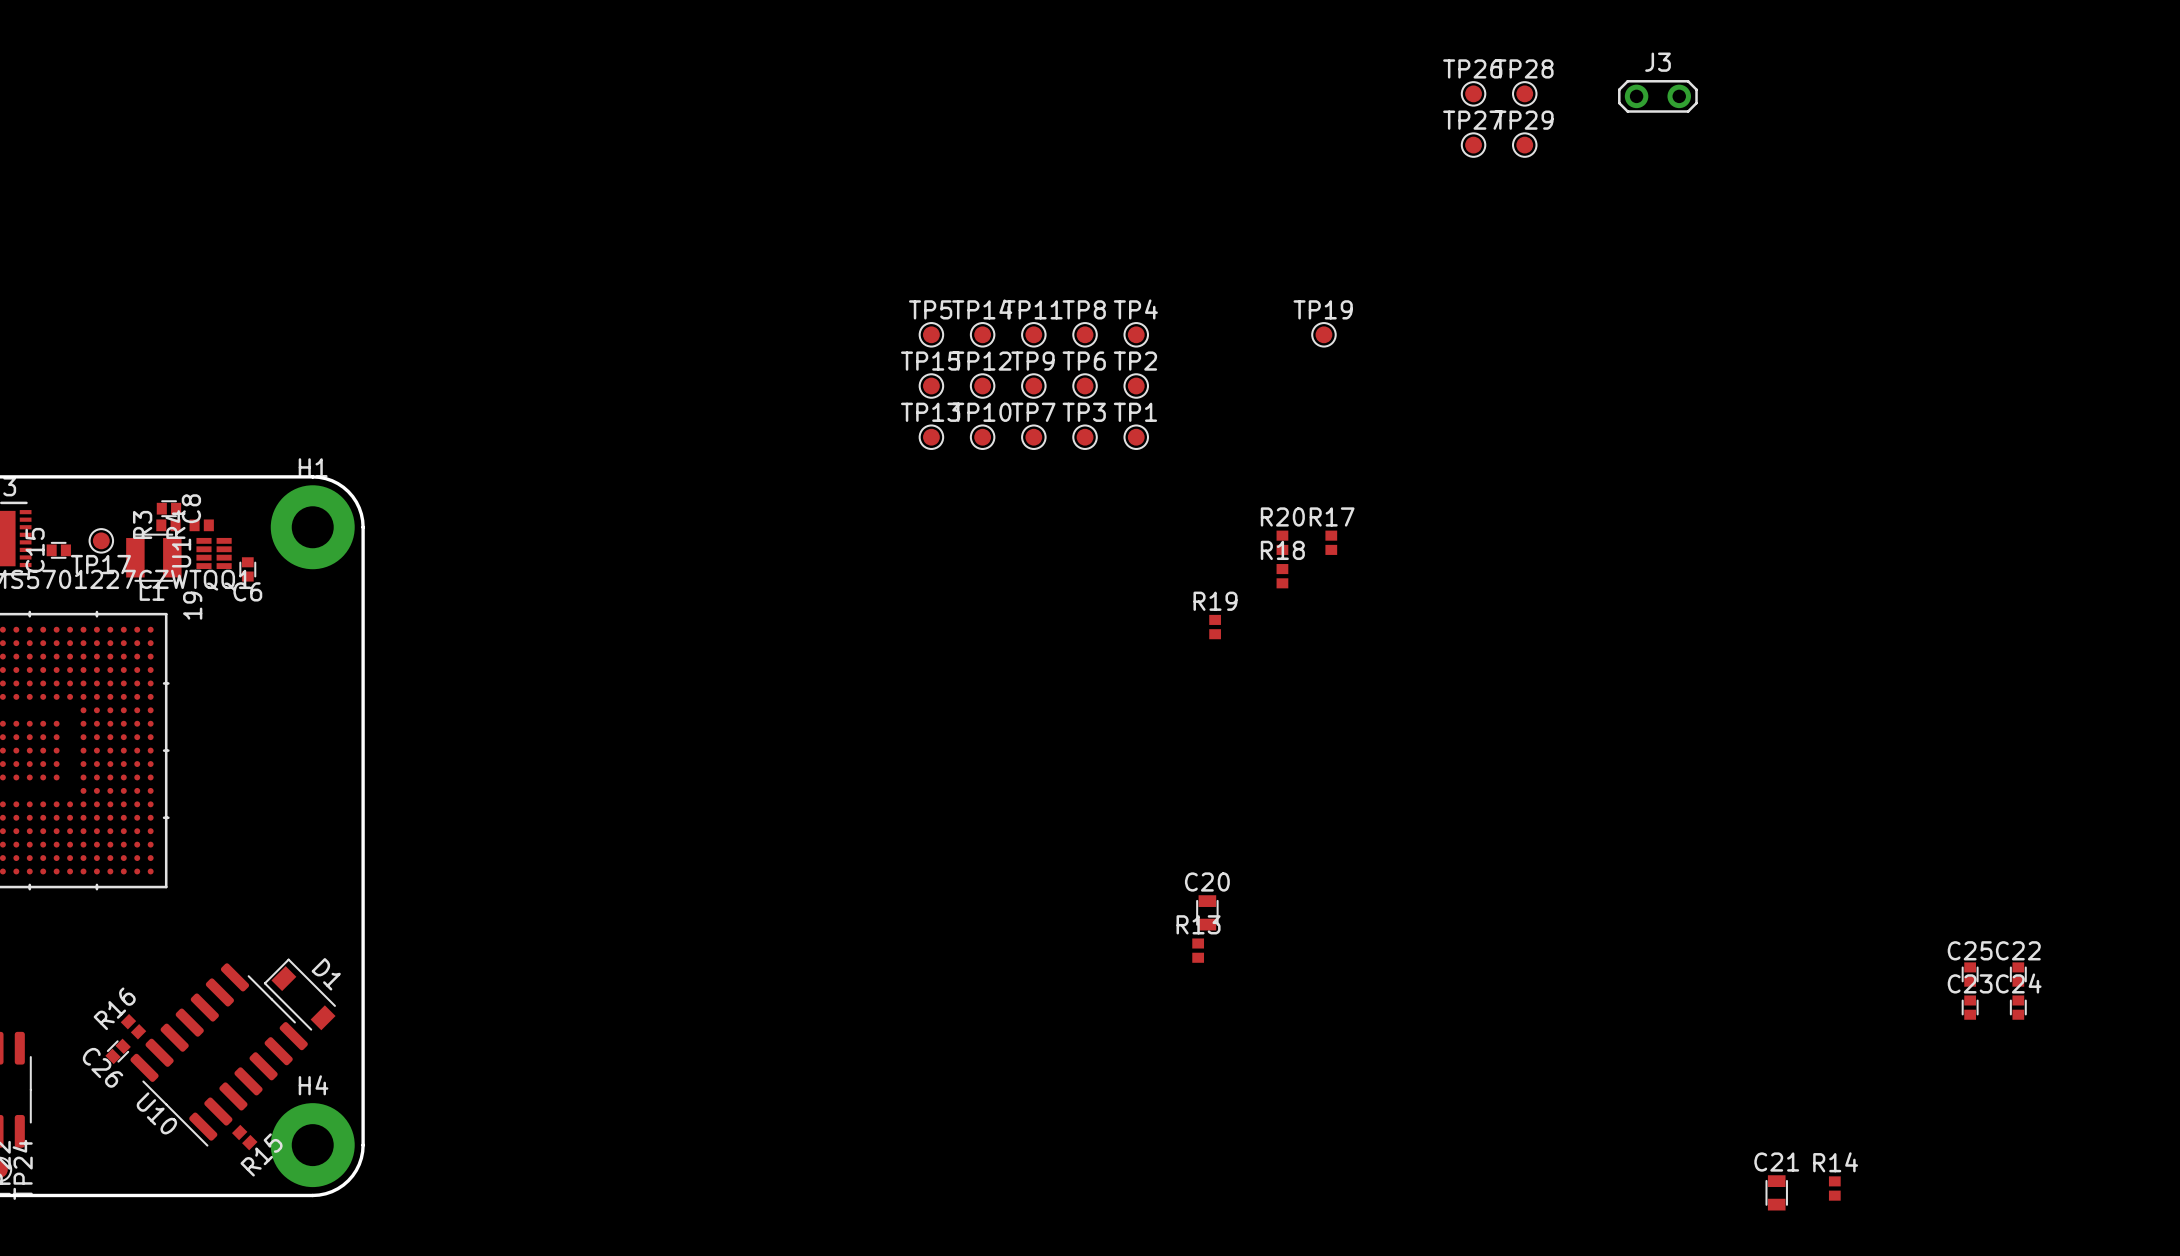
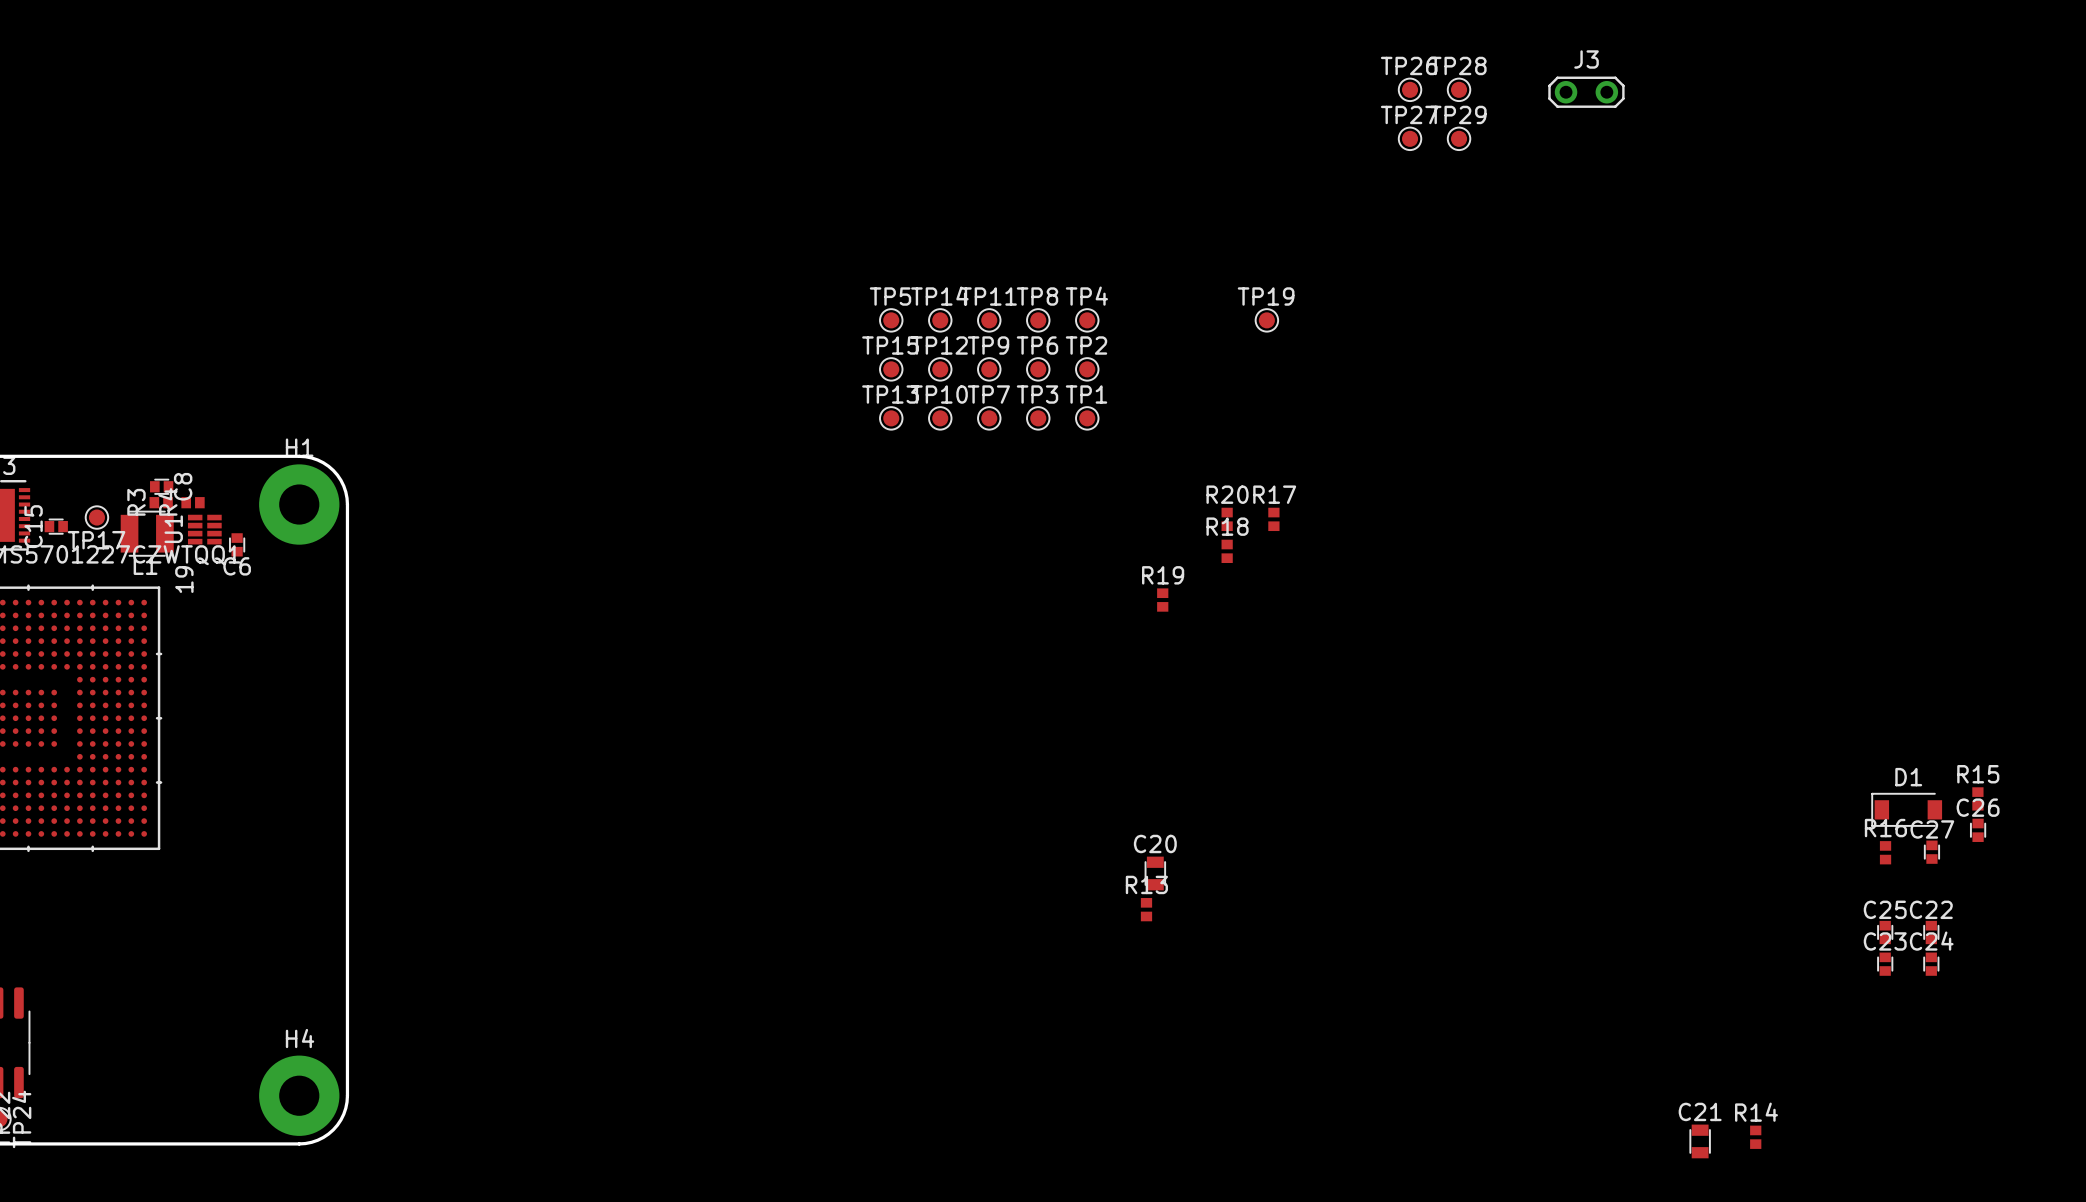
C27: none -> (1931, 852)
D1 rotation: 0° (299, 994) -> 45° counterclockwise (1906, 809)
D1 position: (299, 994) -> (1906, 809)
R16 rotation: 0° (133, 1026) -> 45° clockwise (1885, 852)
R16 position: (133, 1026) -> (1885, 852)
C26 rotation: 0° (118, 1051) -> 45° counterclockwise (1978, 830)
C26 position: (118, 1051) -> (1978, 830)
U10: (219, 1054) -> none
C26 name position: C26 (103, 1067) -> C26 (1978, 807)
R15 rotation: 0° (244, 1137) -> 45° clockwise (1977, 798)
R15 position: (244, 1137) -> (1977, 798)
R15 name position: R15 (261, 1154) -> R15 (1978, 774)

